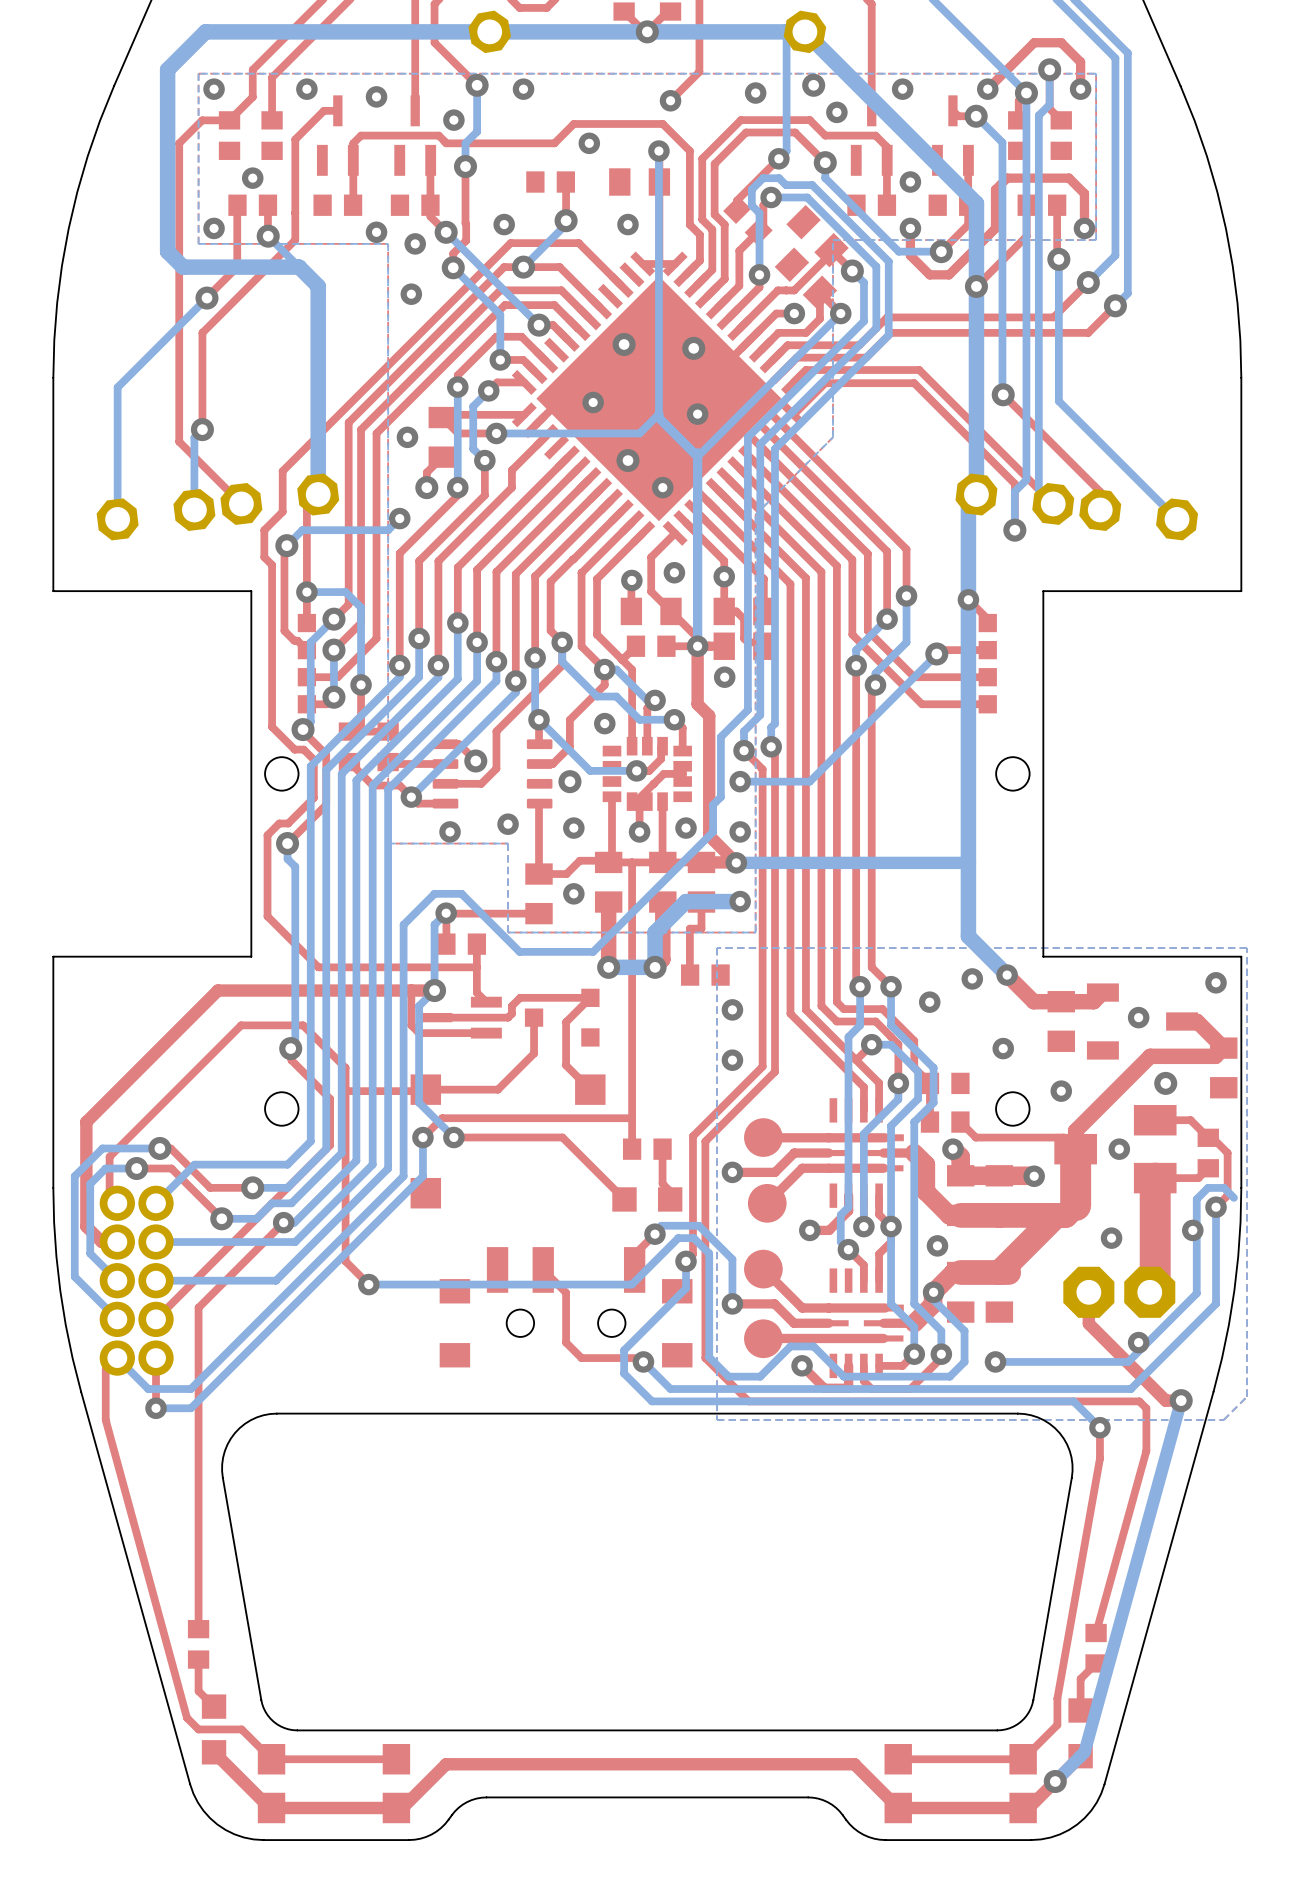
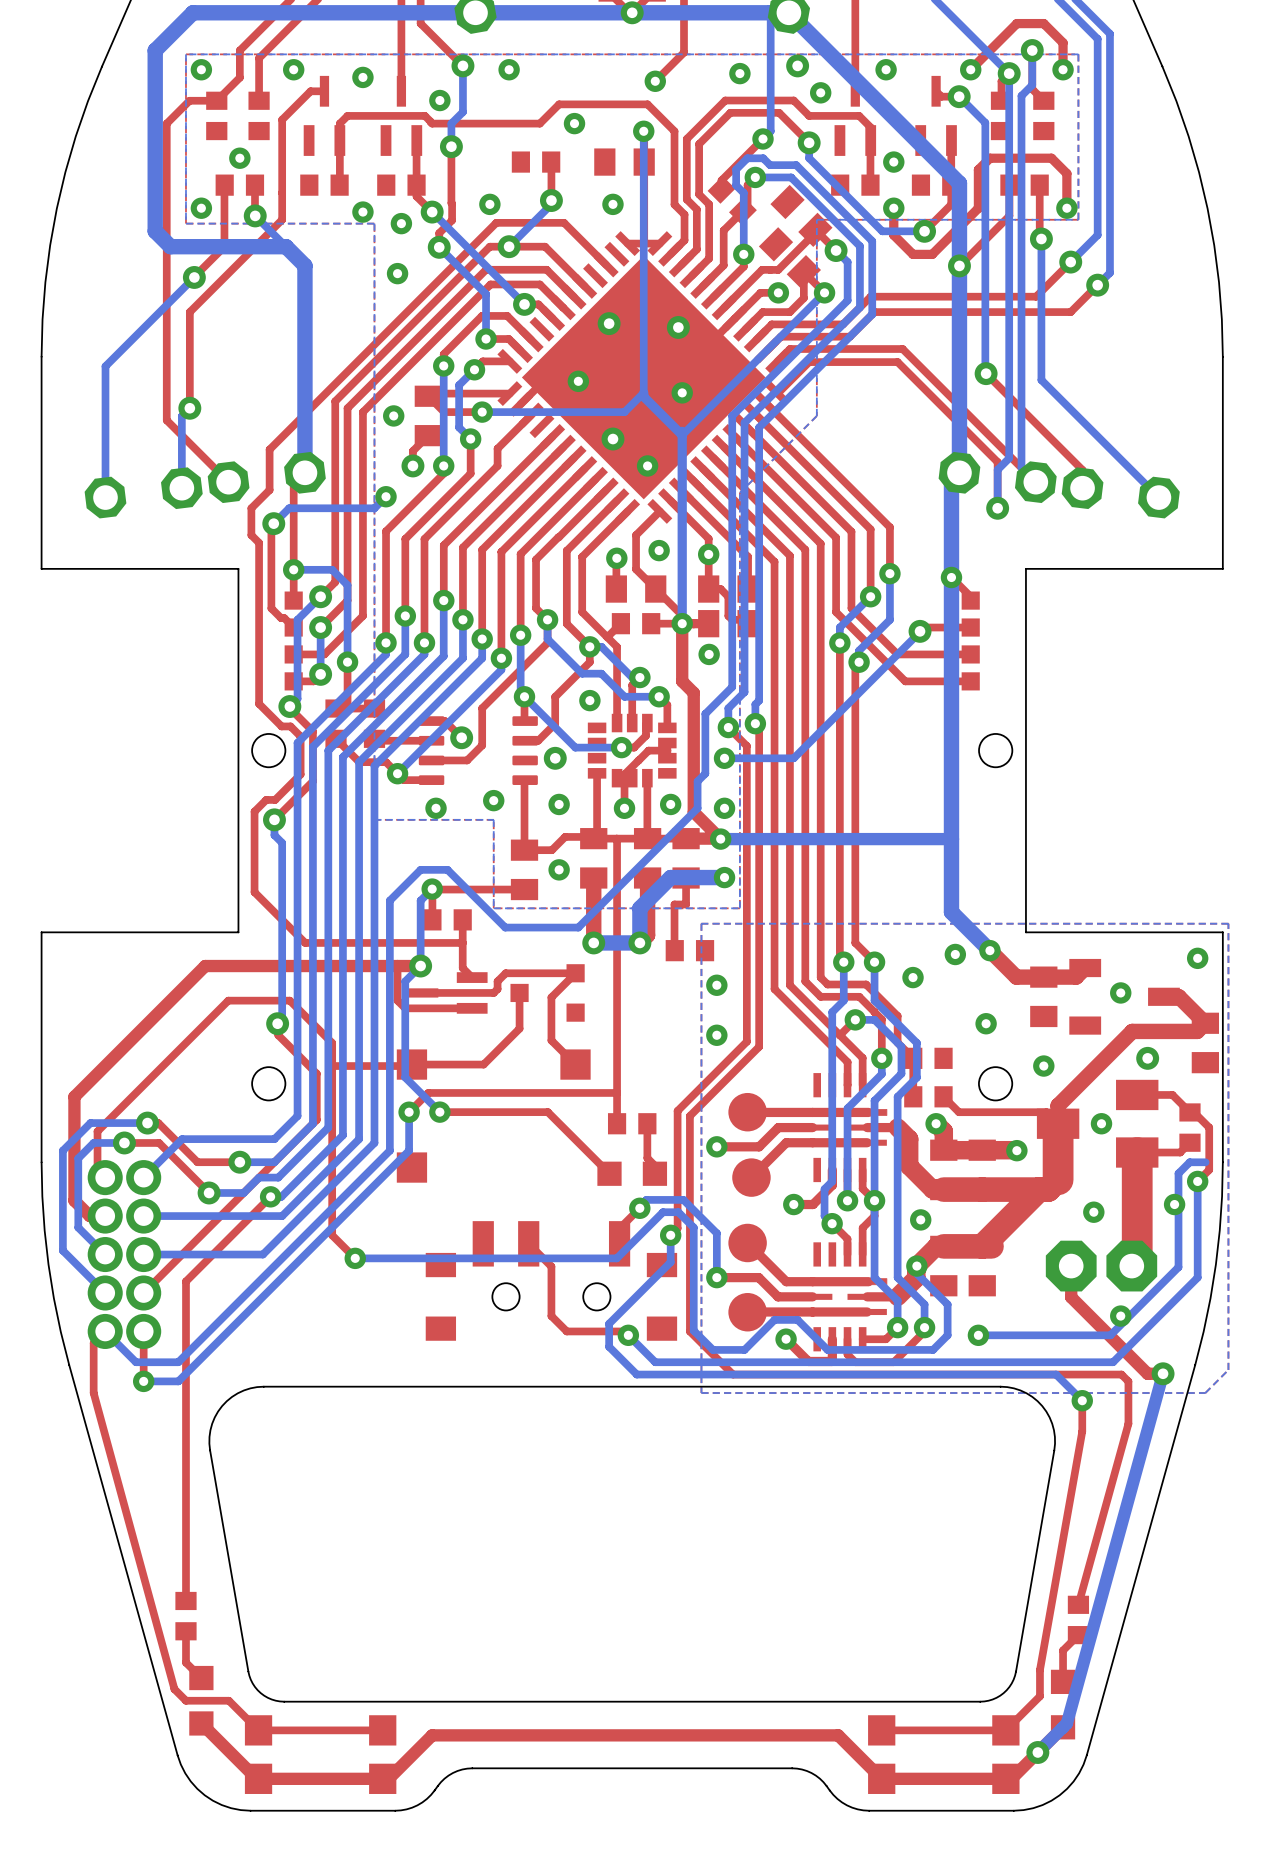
bottom track: (1224, 1187) (1233, 1197) -> none

